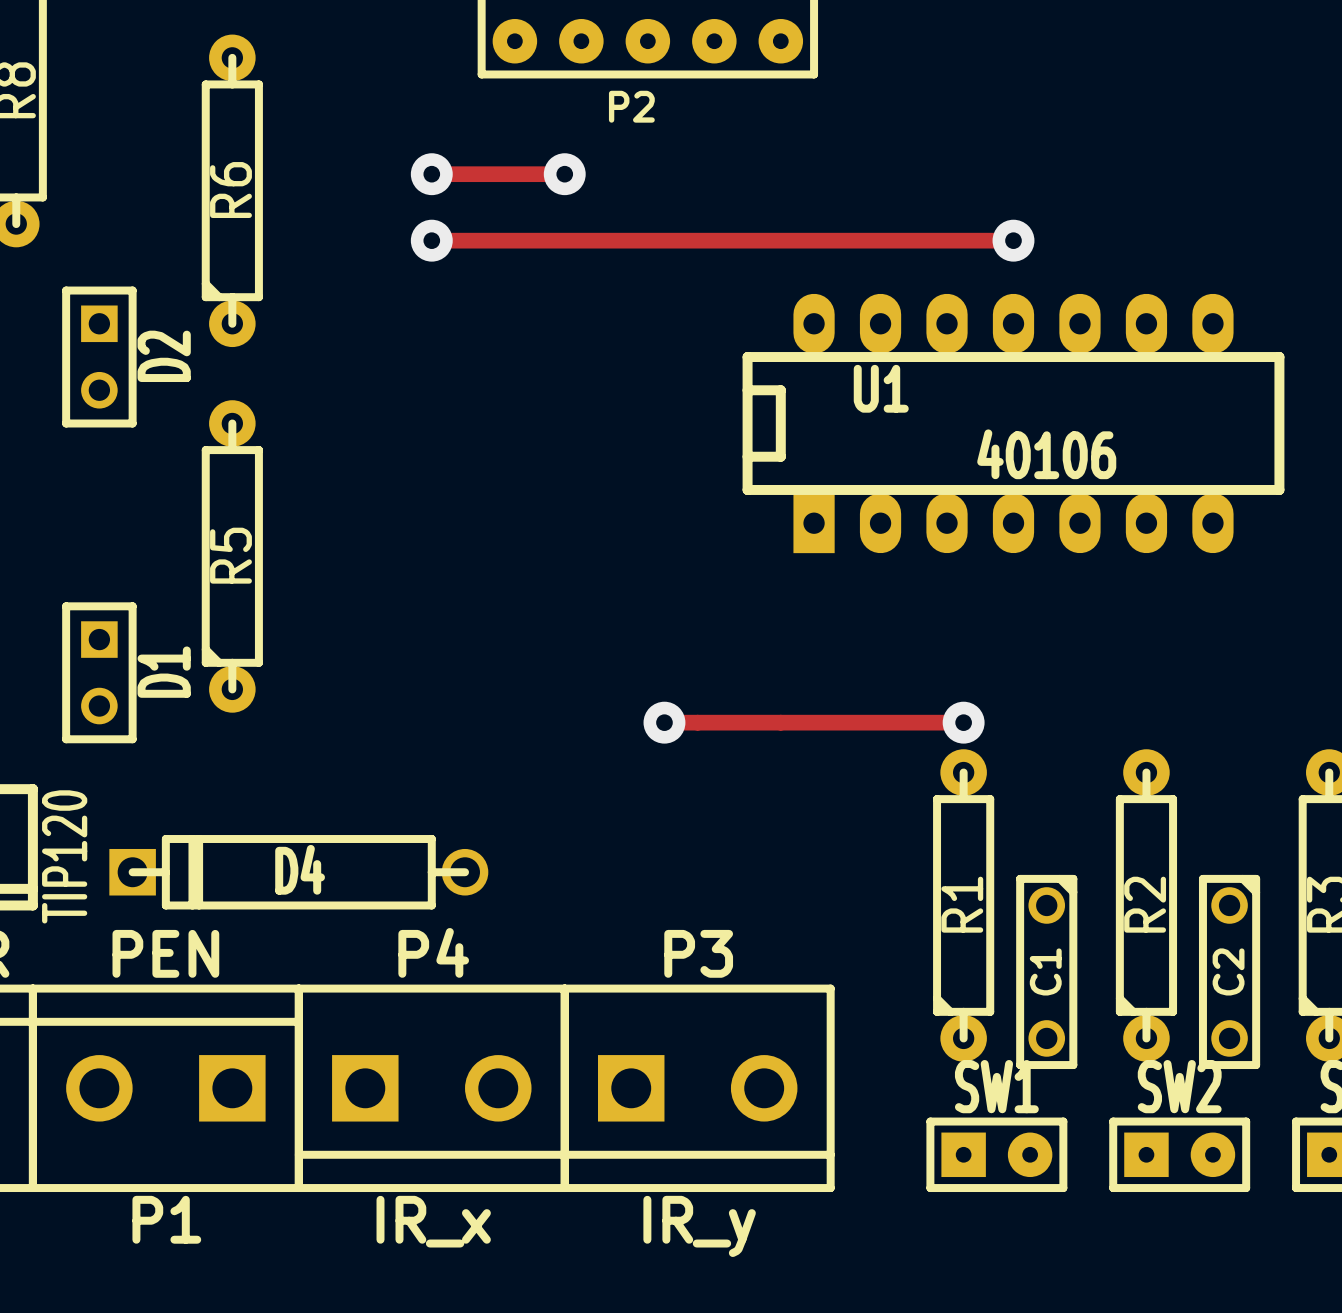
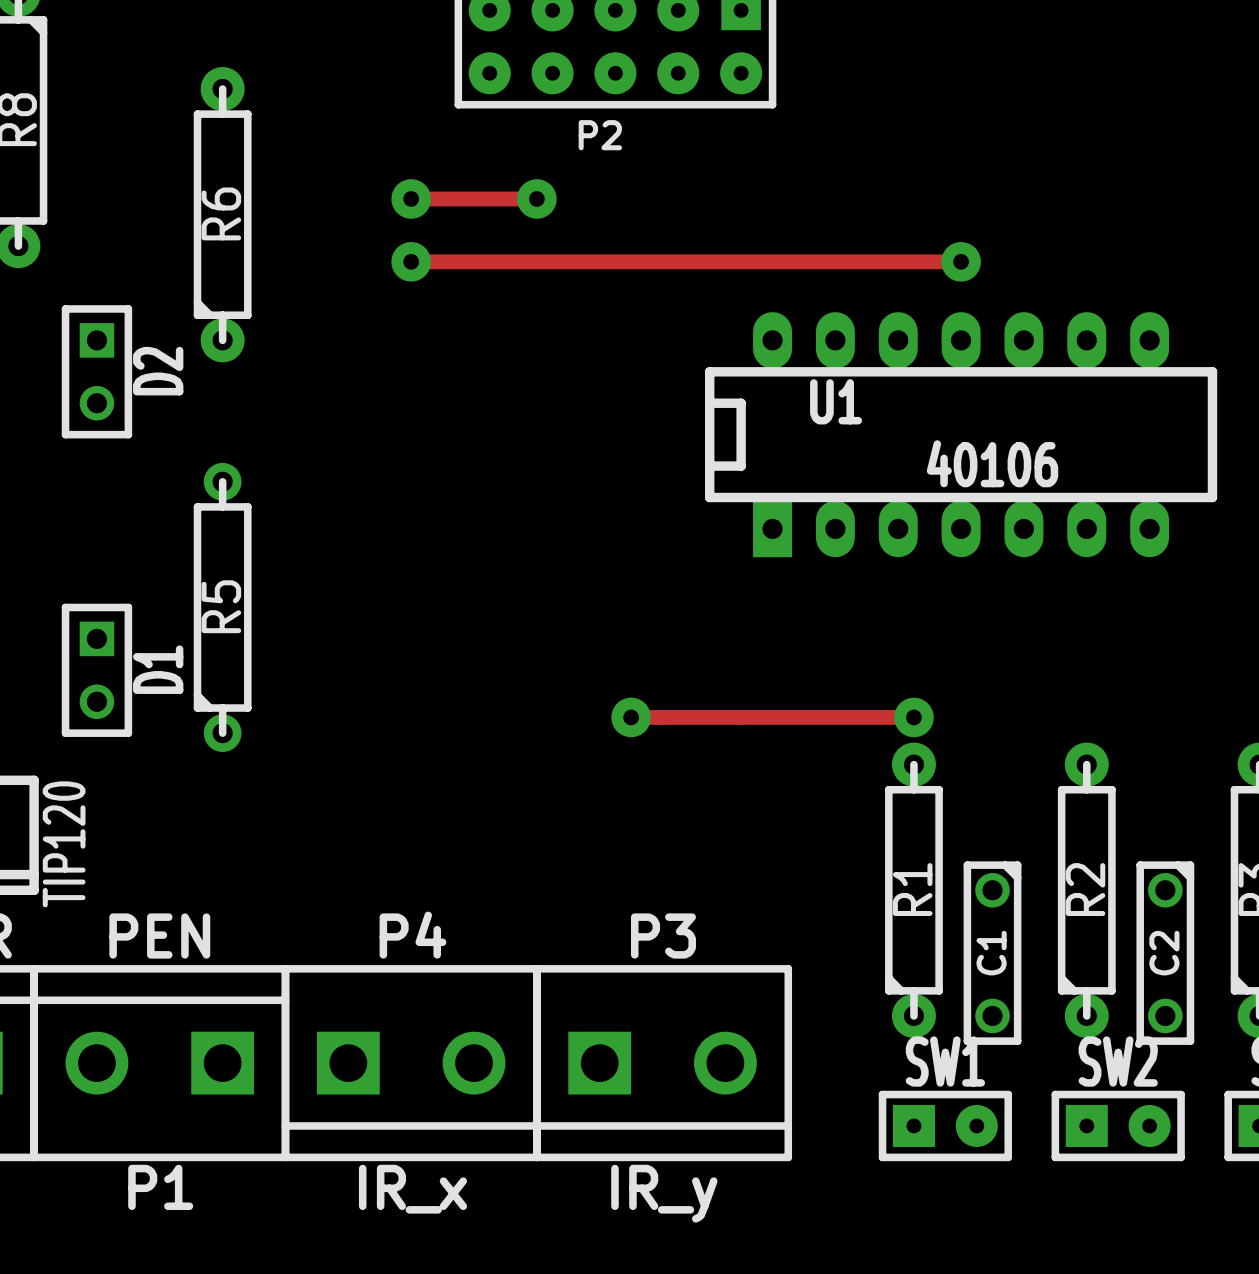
R5 footprint: [201, 400, 263, 713] -> [193, 462, 252, 753]
D4: (298, 872) -> none

